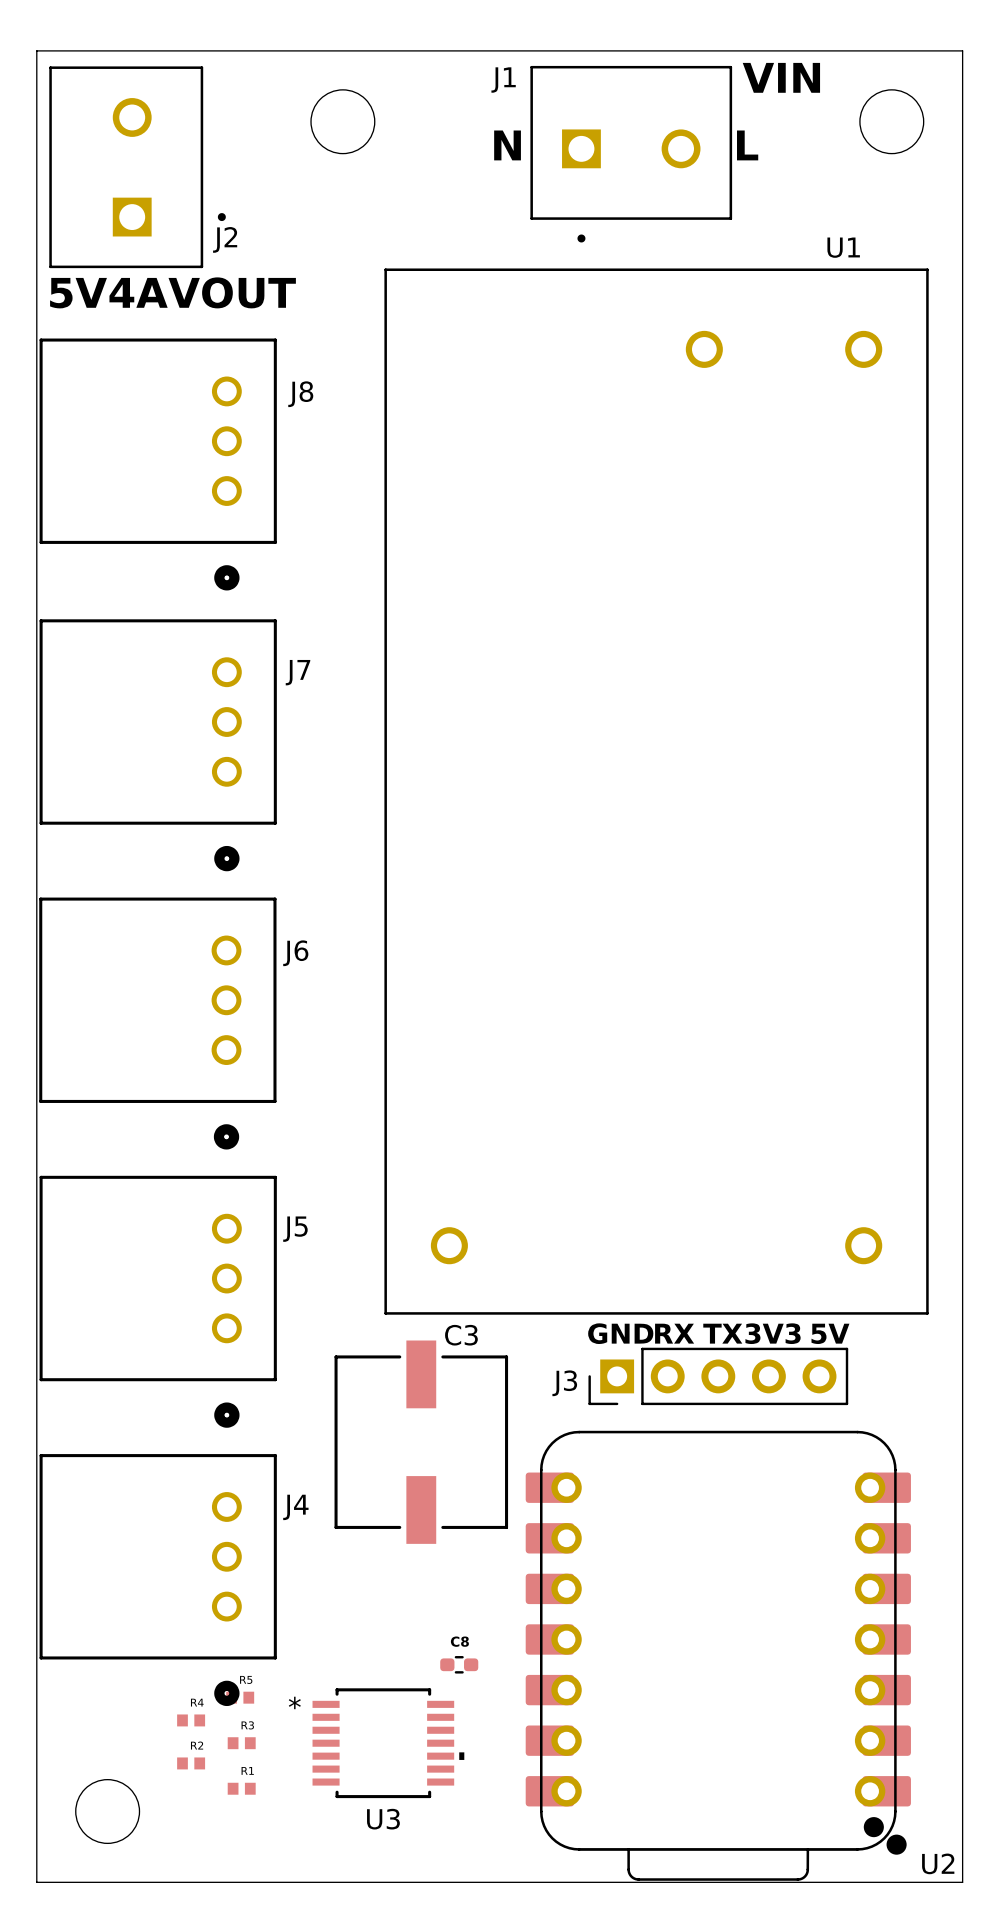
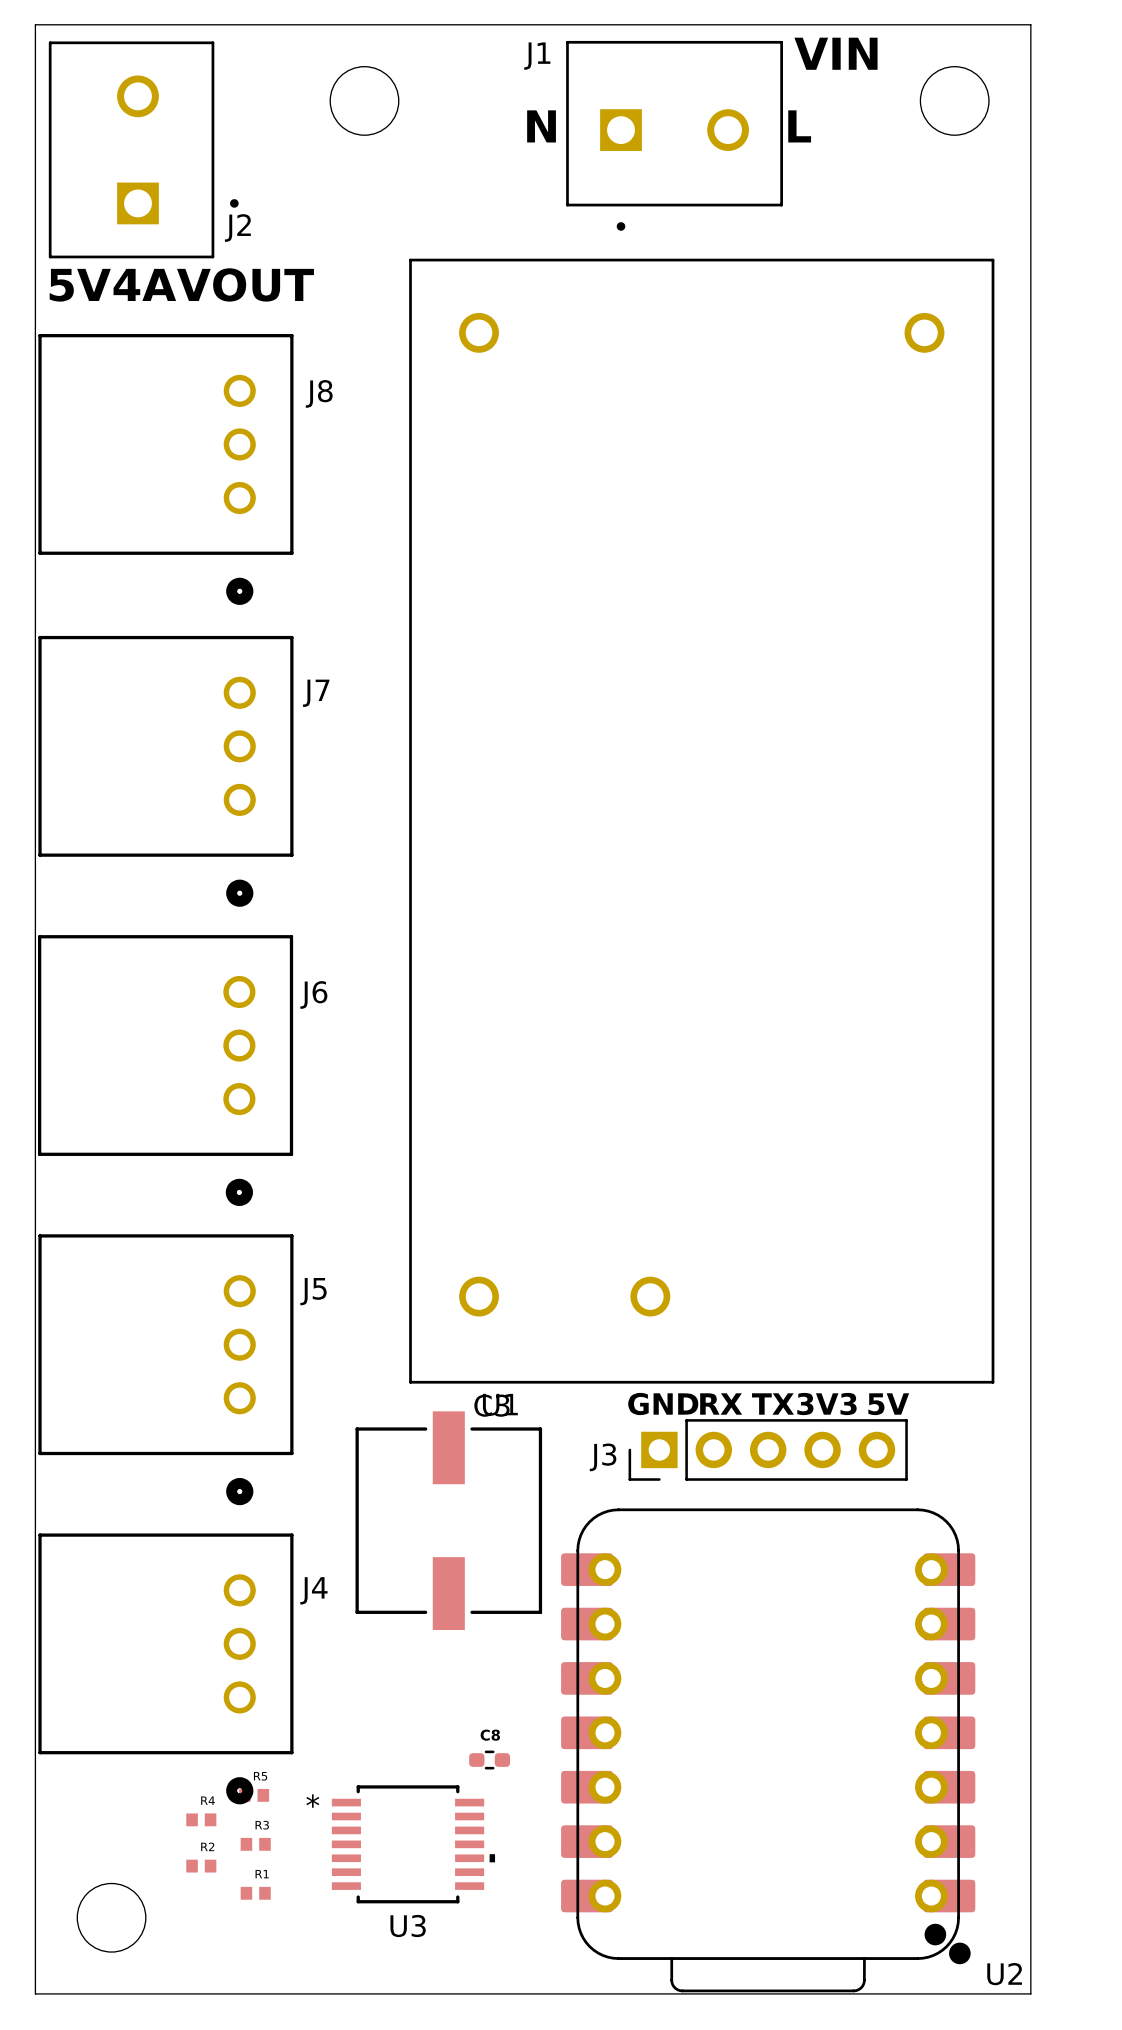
U1 rotation: 0° (656, 791) -> 180° (701, 821)

